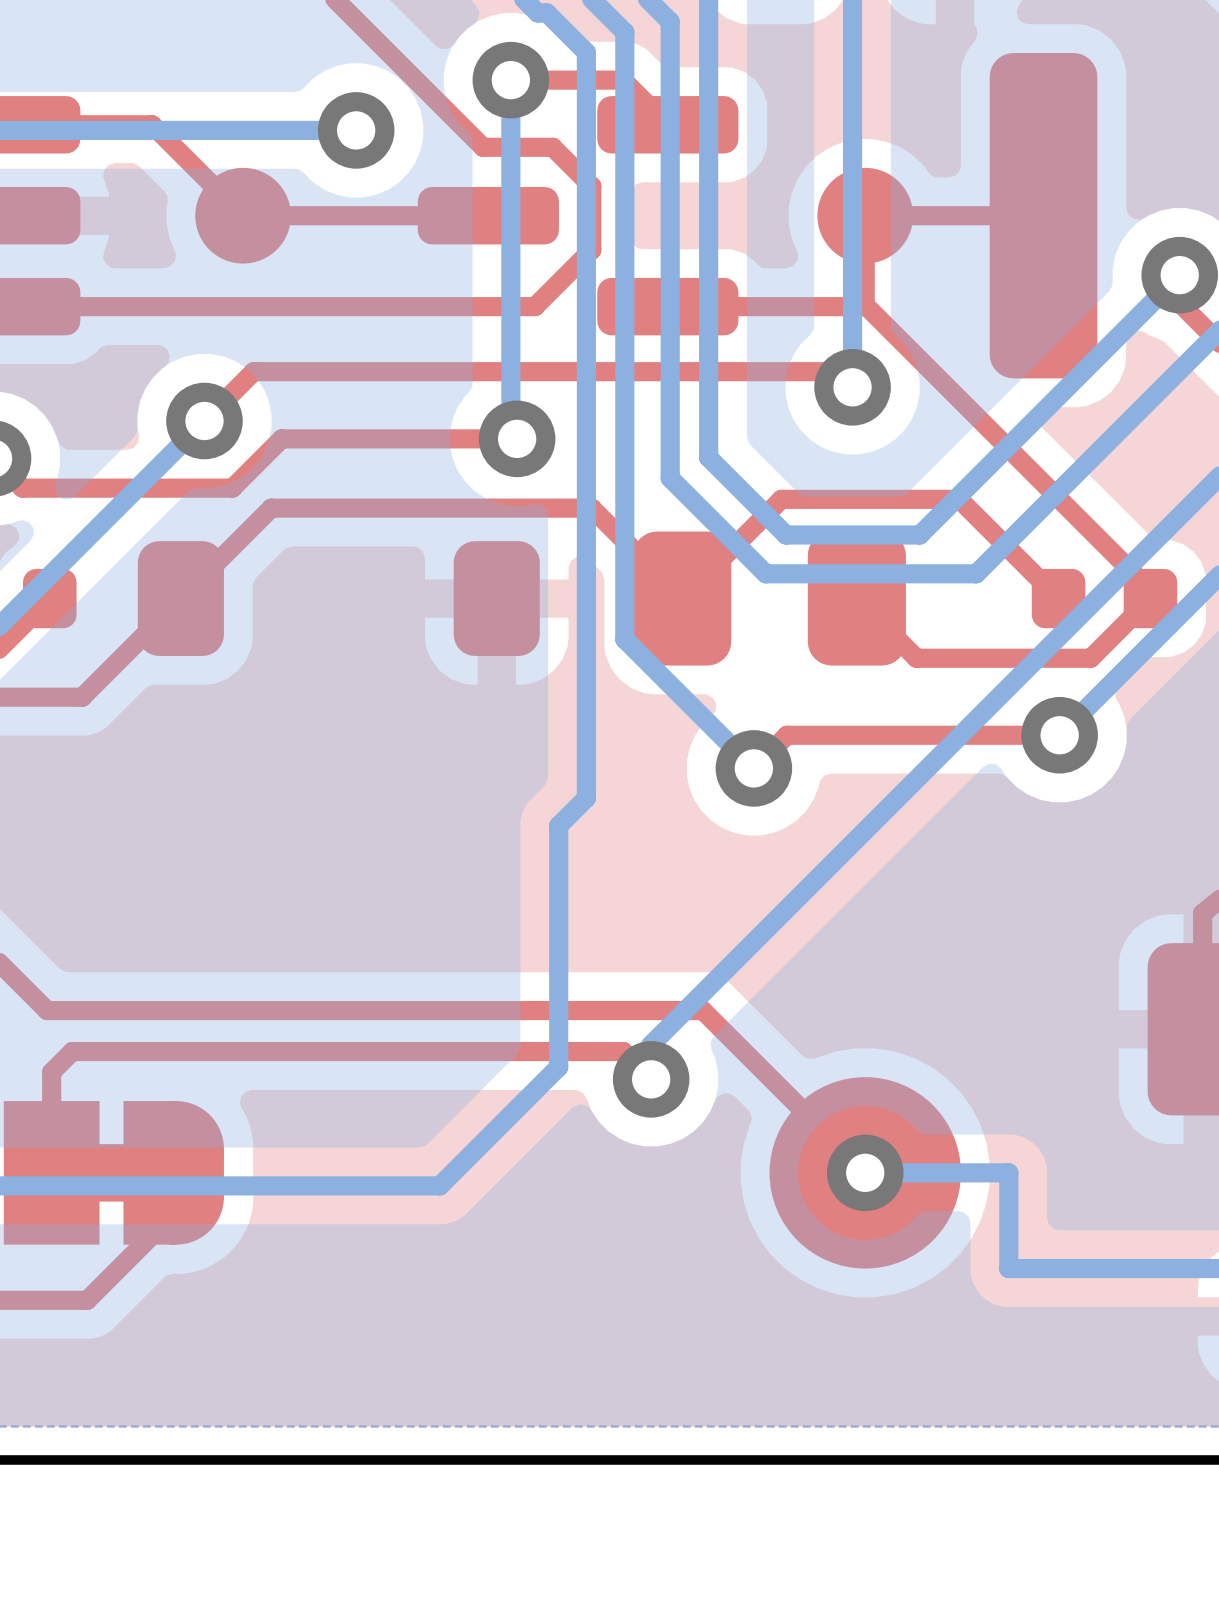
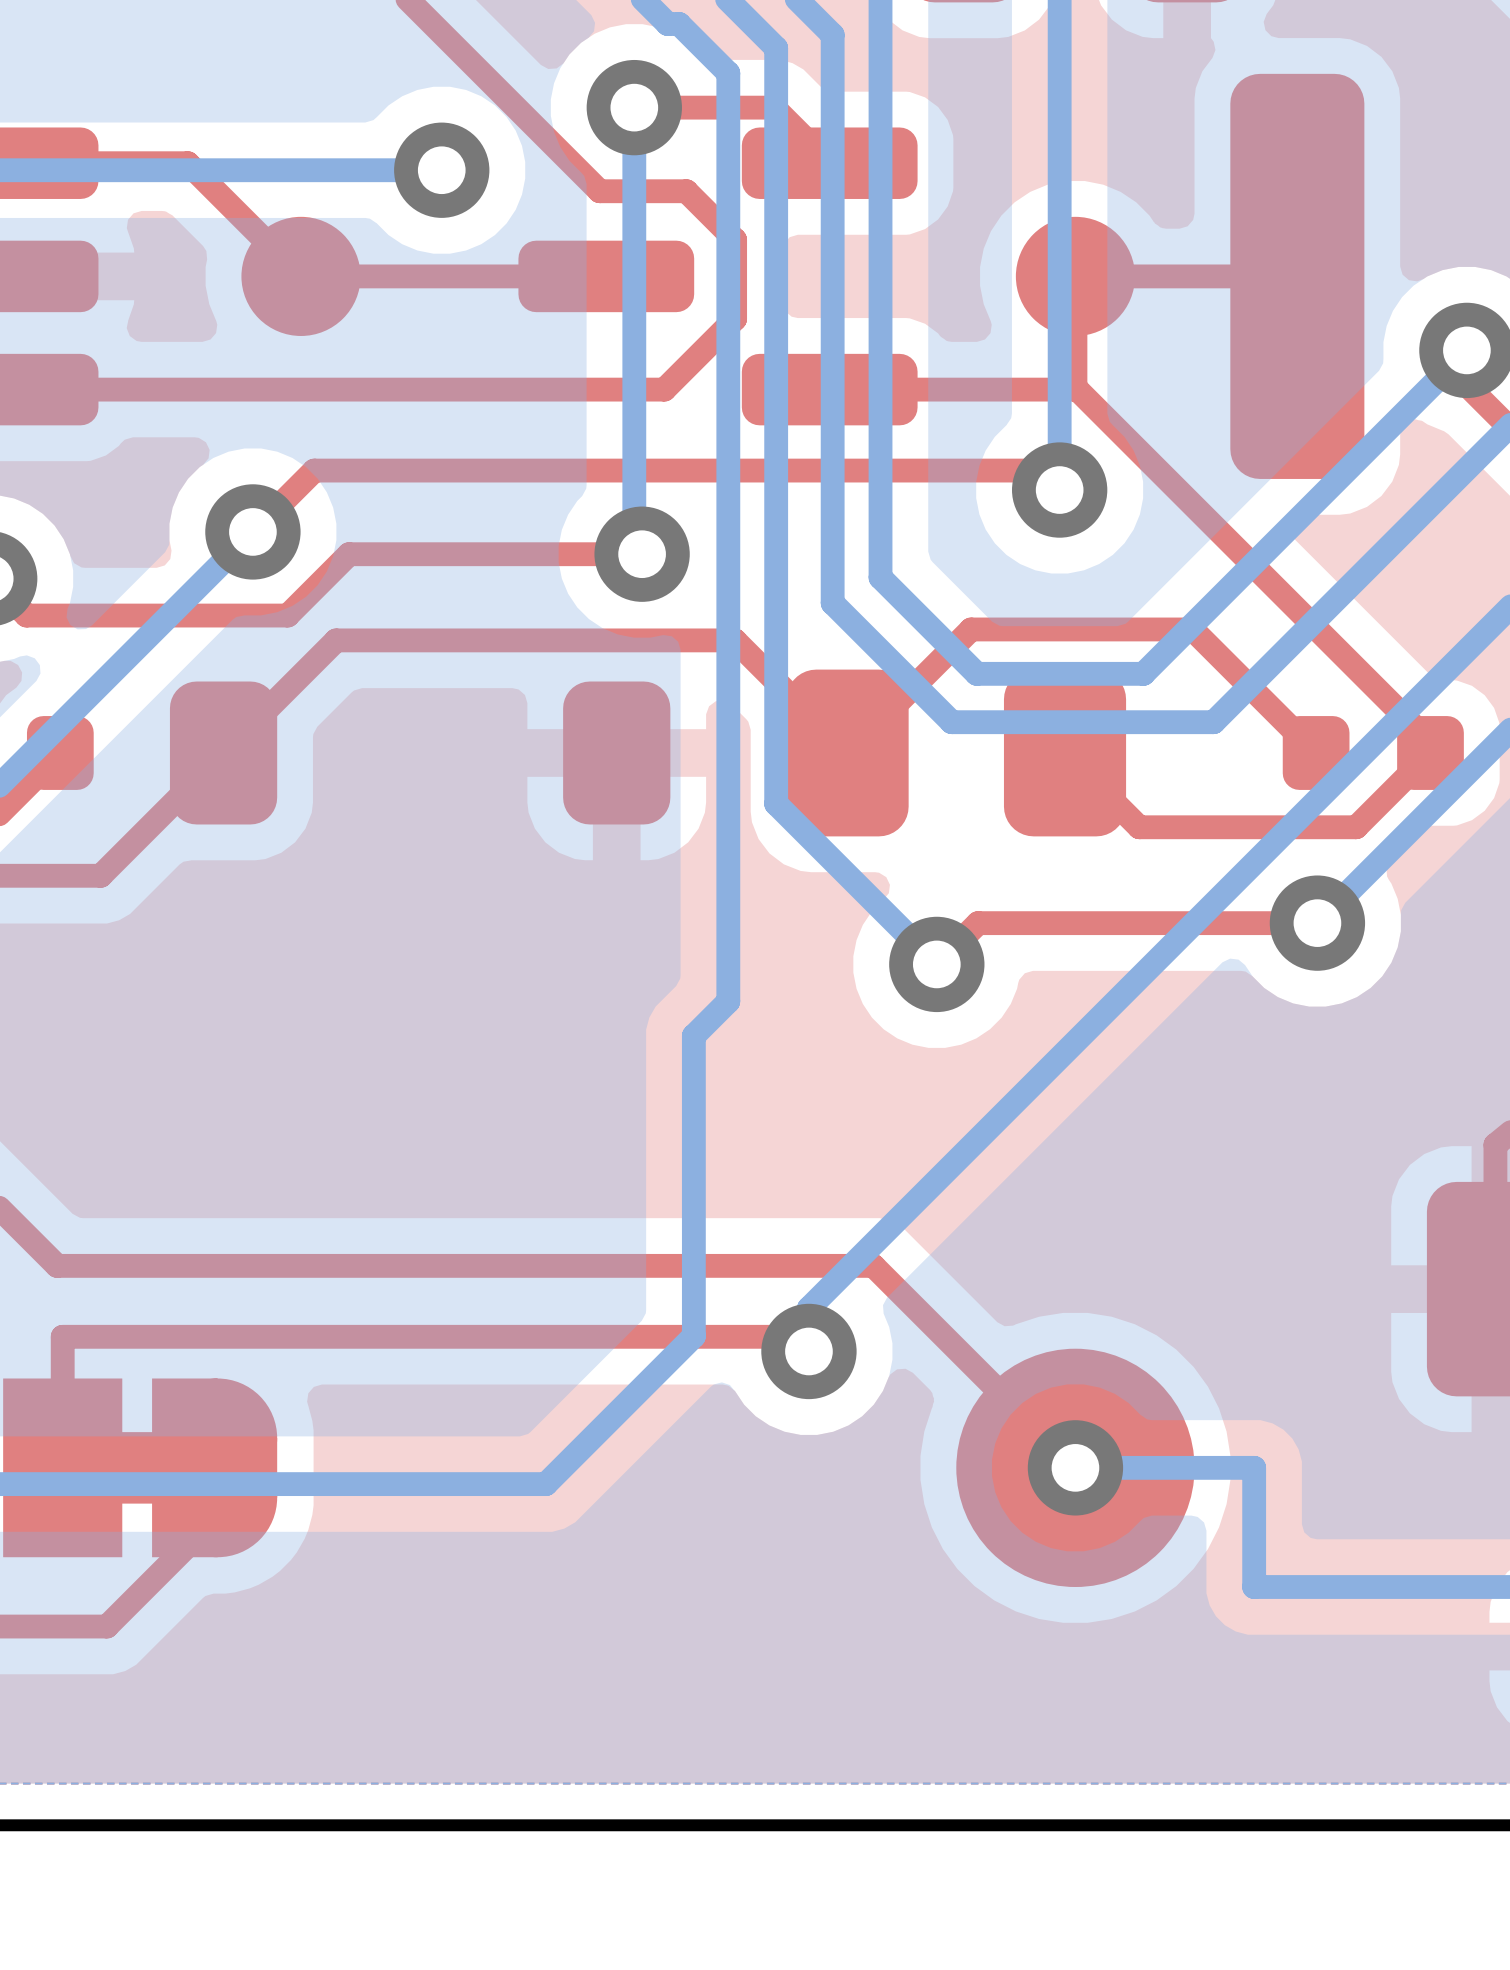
top track: (51, 1072) (72, 1051) (623, 1051) (651, 1079) -> (62, 1342) (62, 1336) (777, 1336) (808, 1351)

